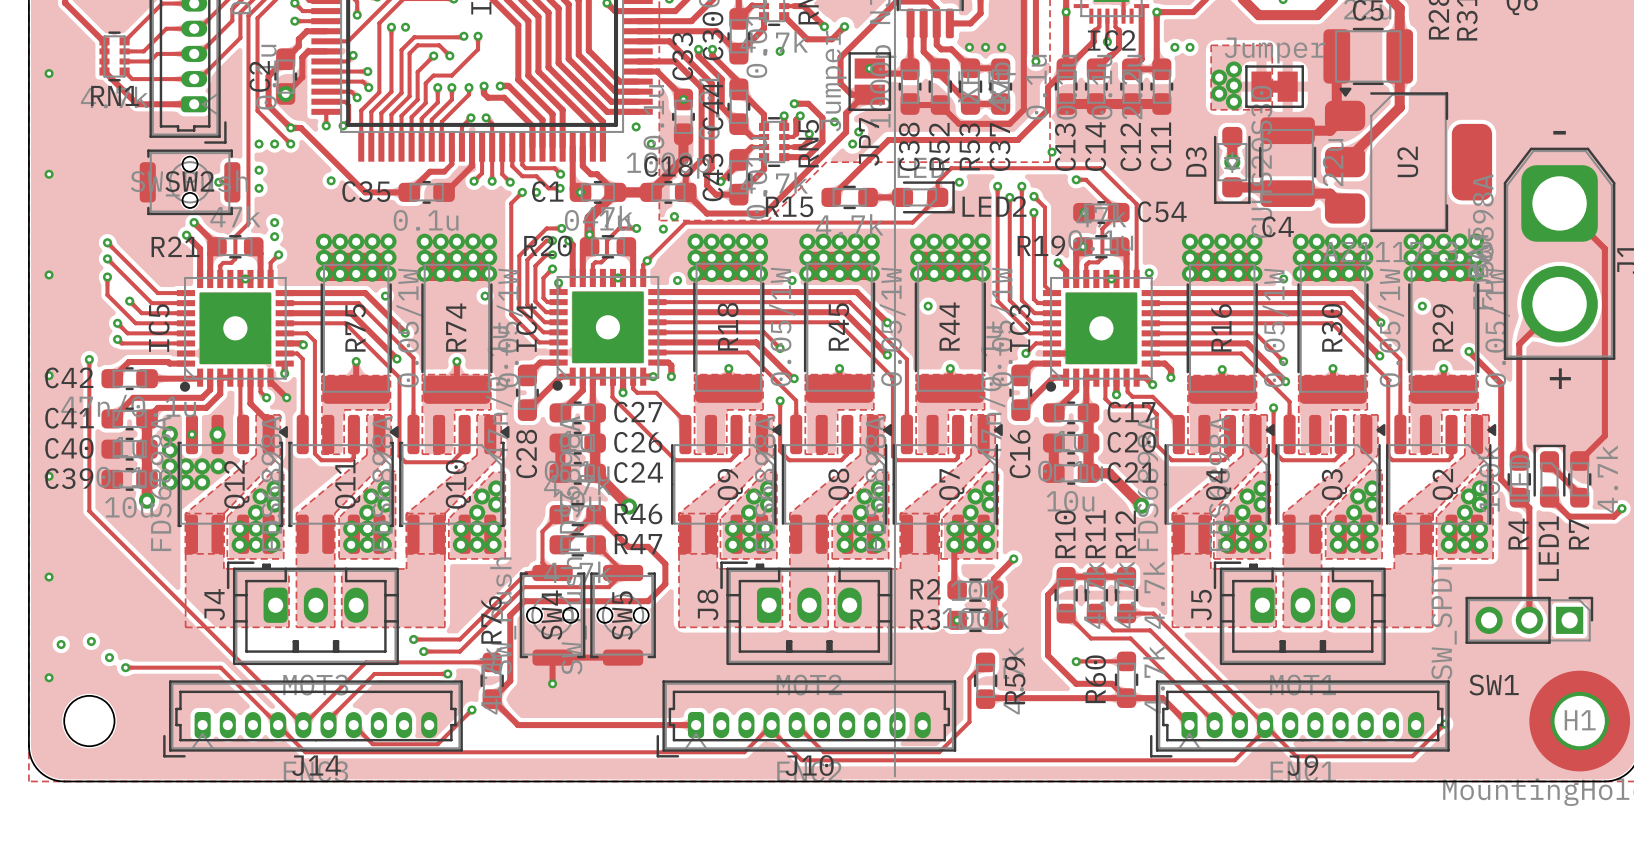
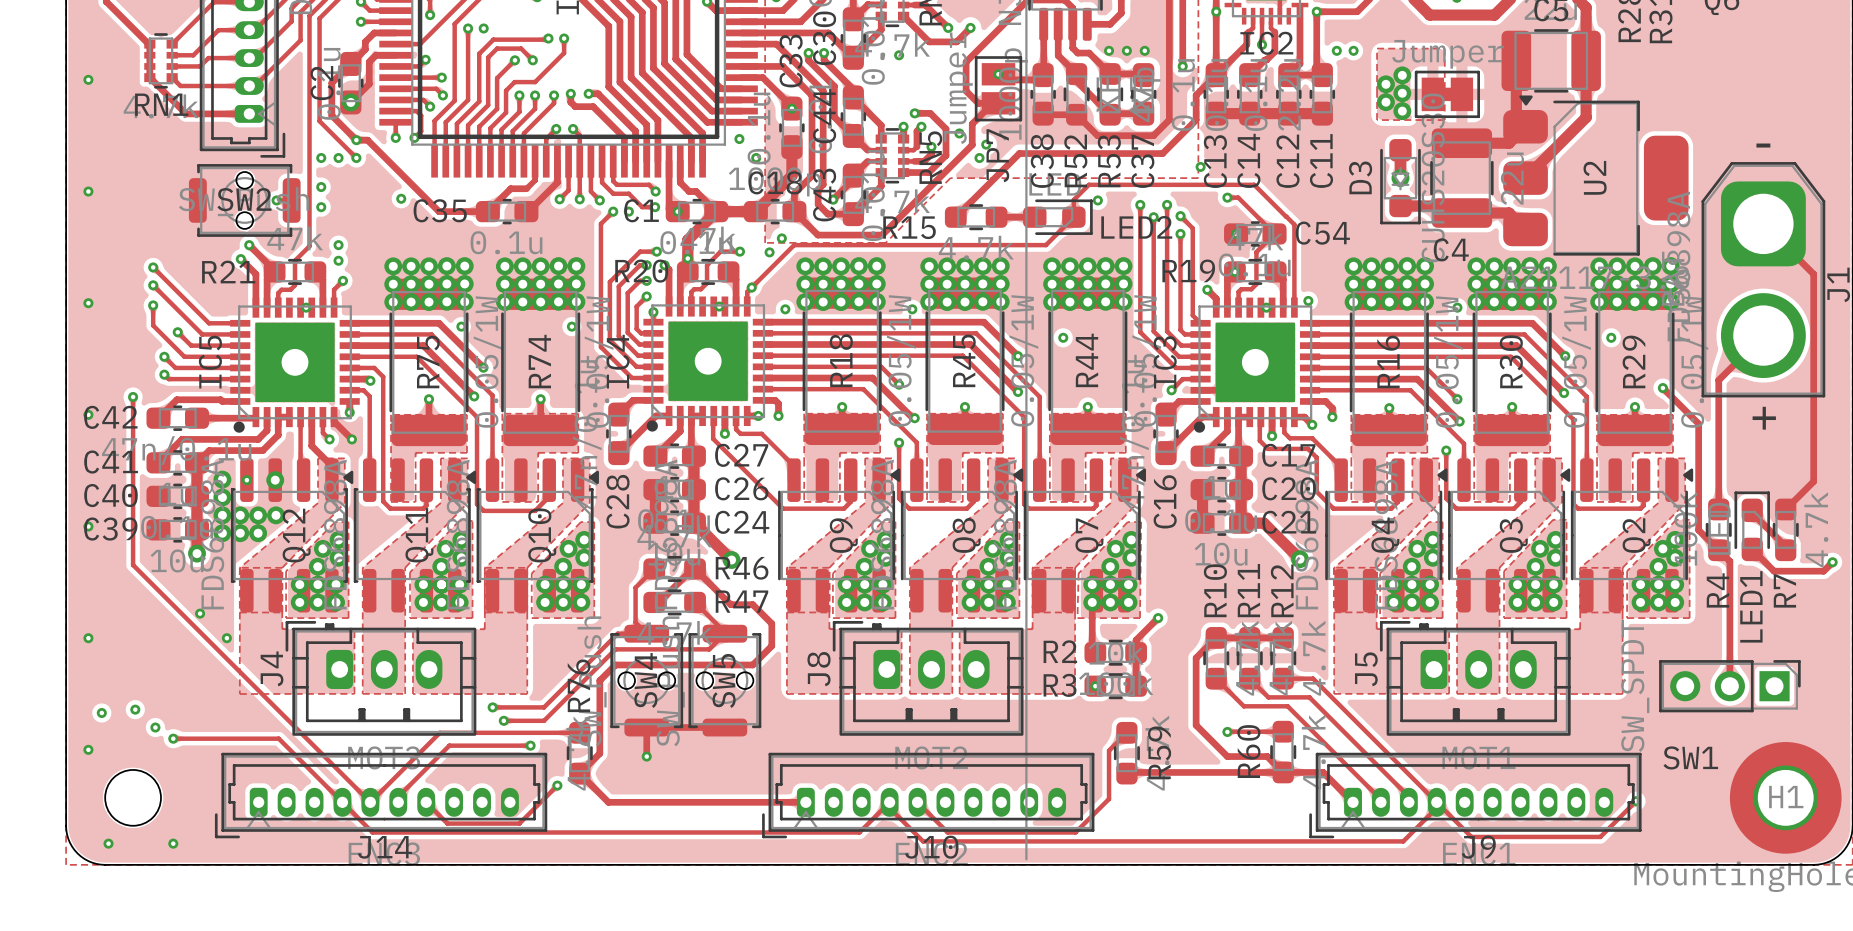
via: none -> (200, 613)
via: none -> (226, 638)
via: none -> (108, 843)
via: none -> (173, 843)

